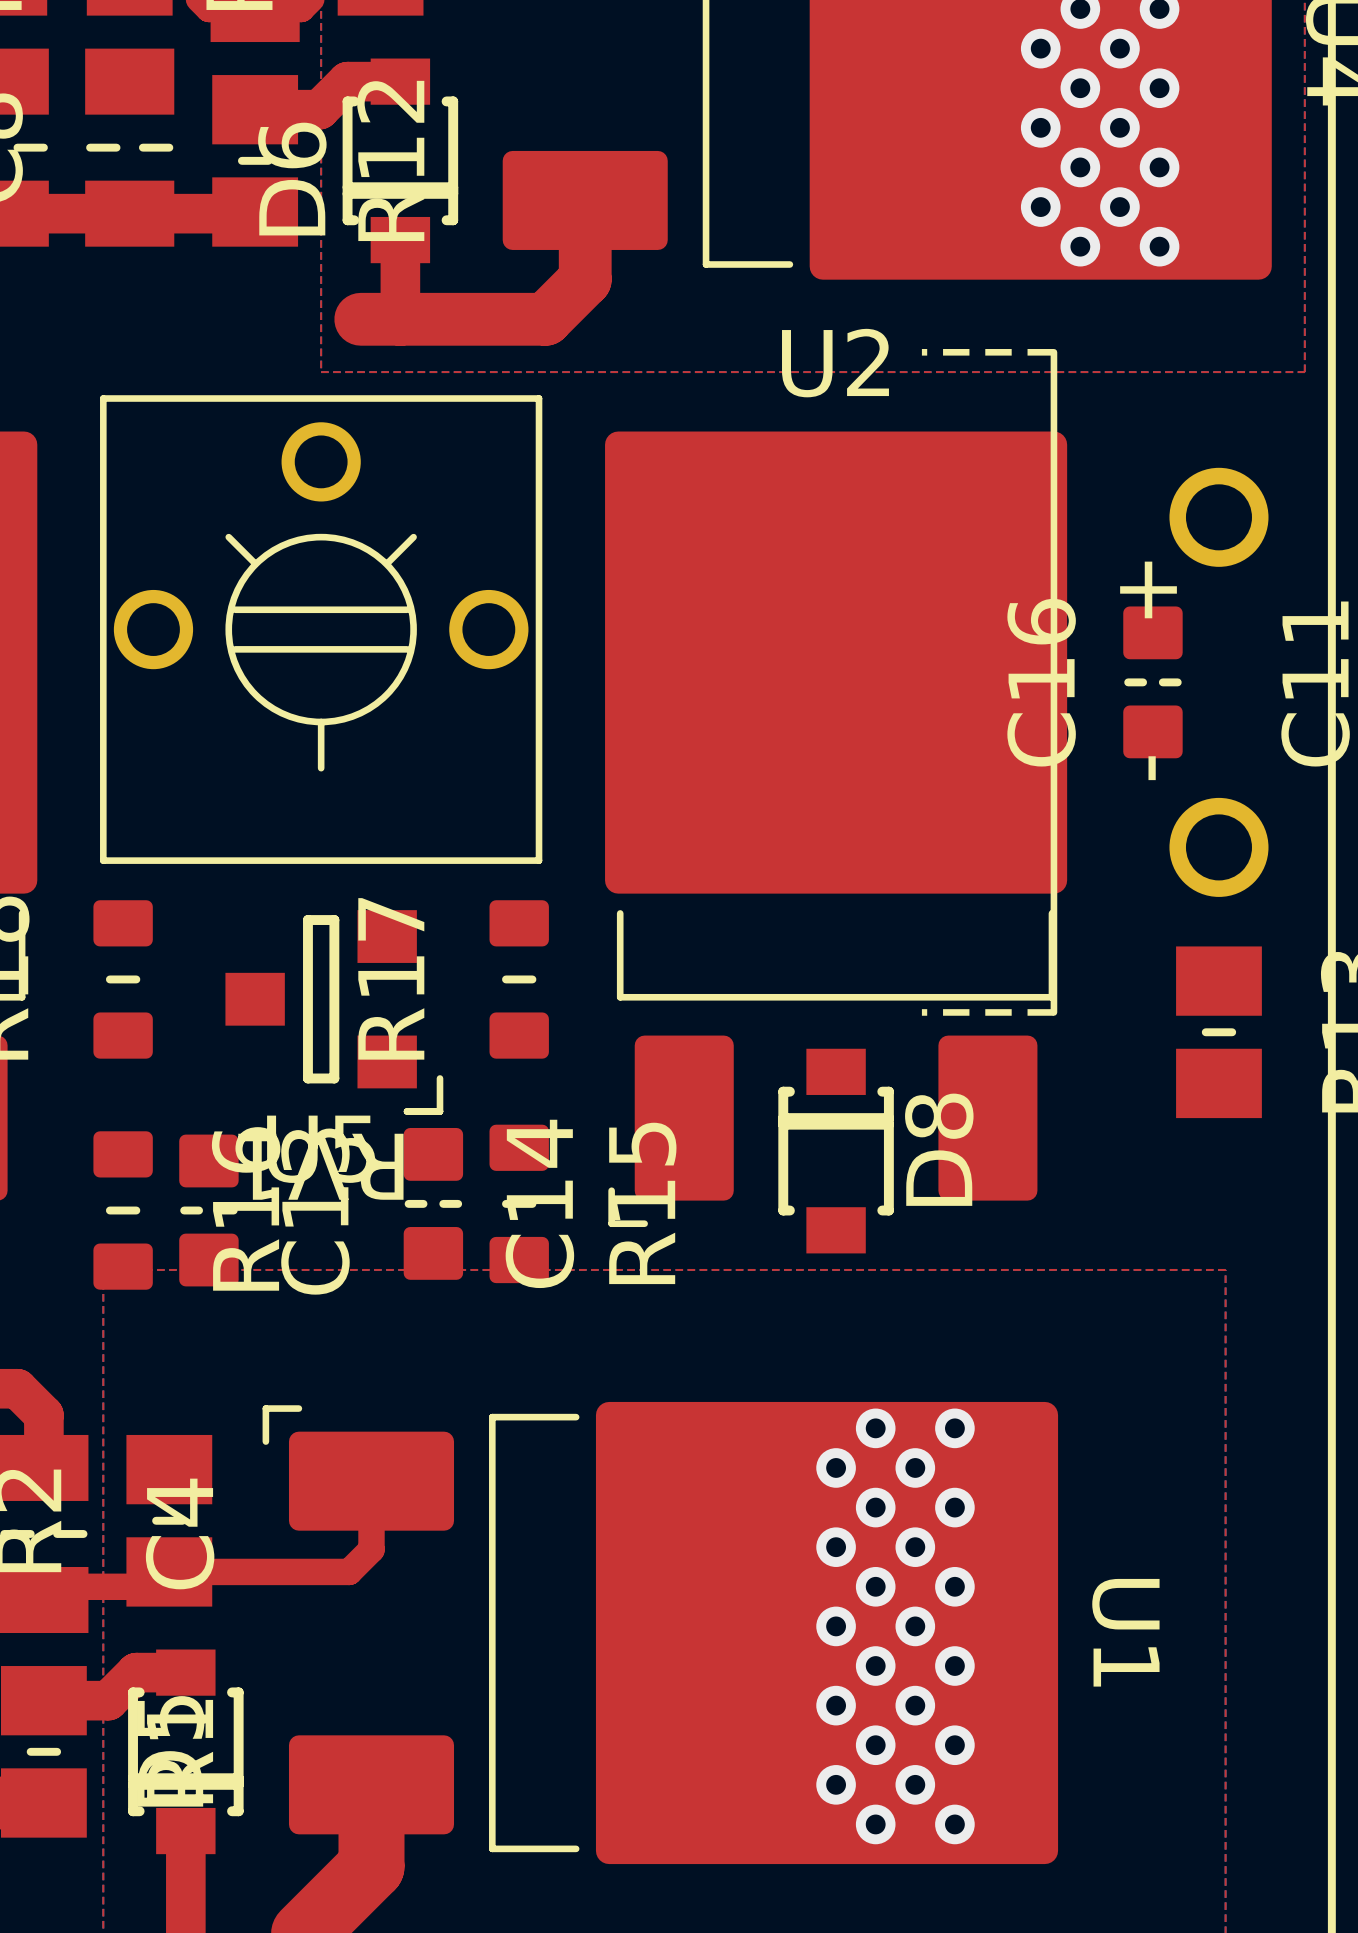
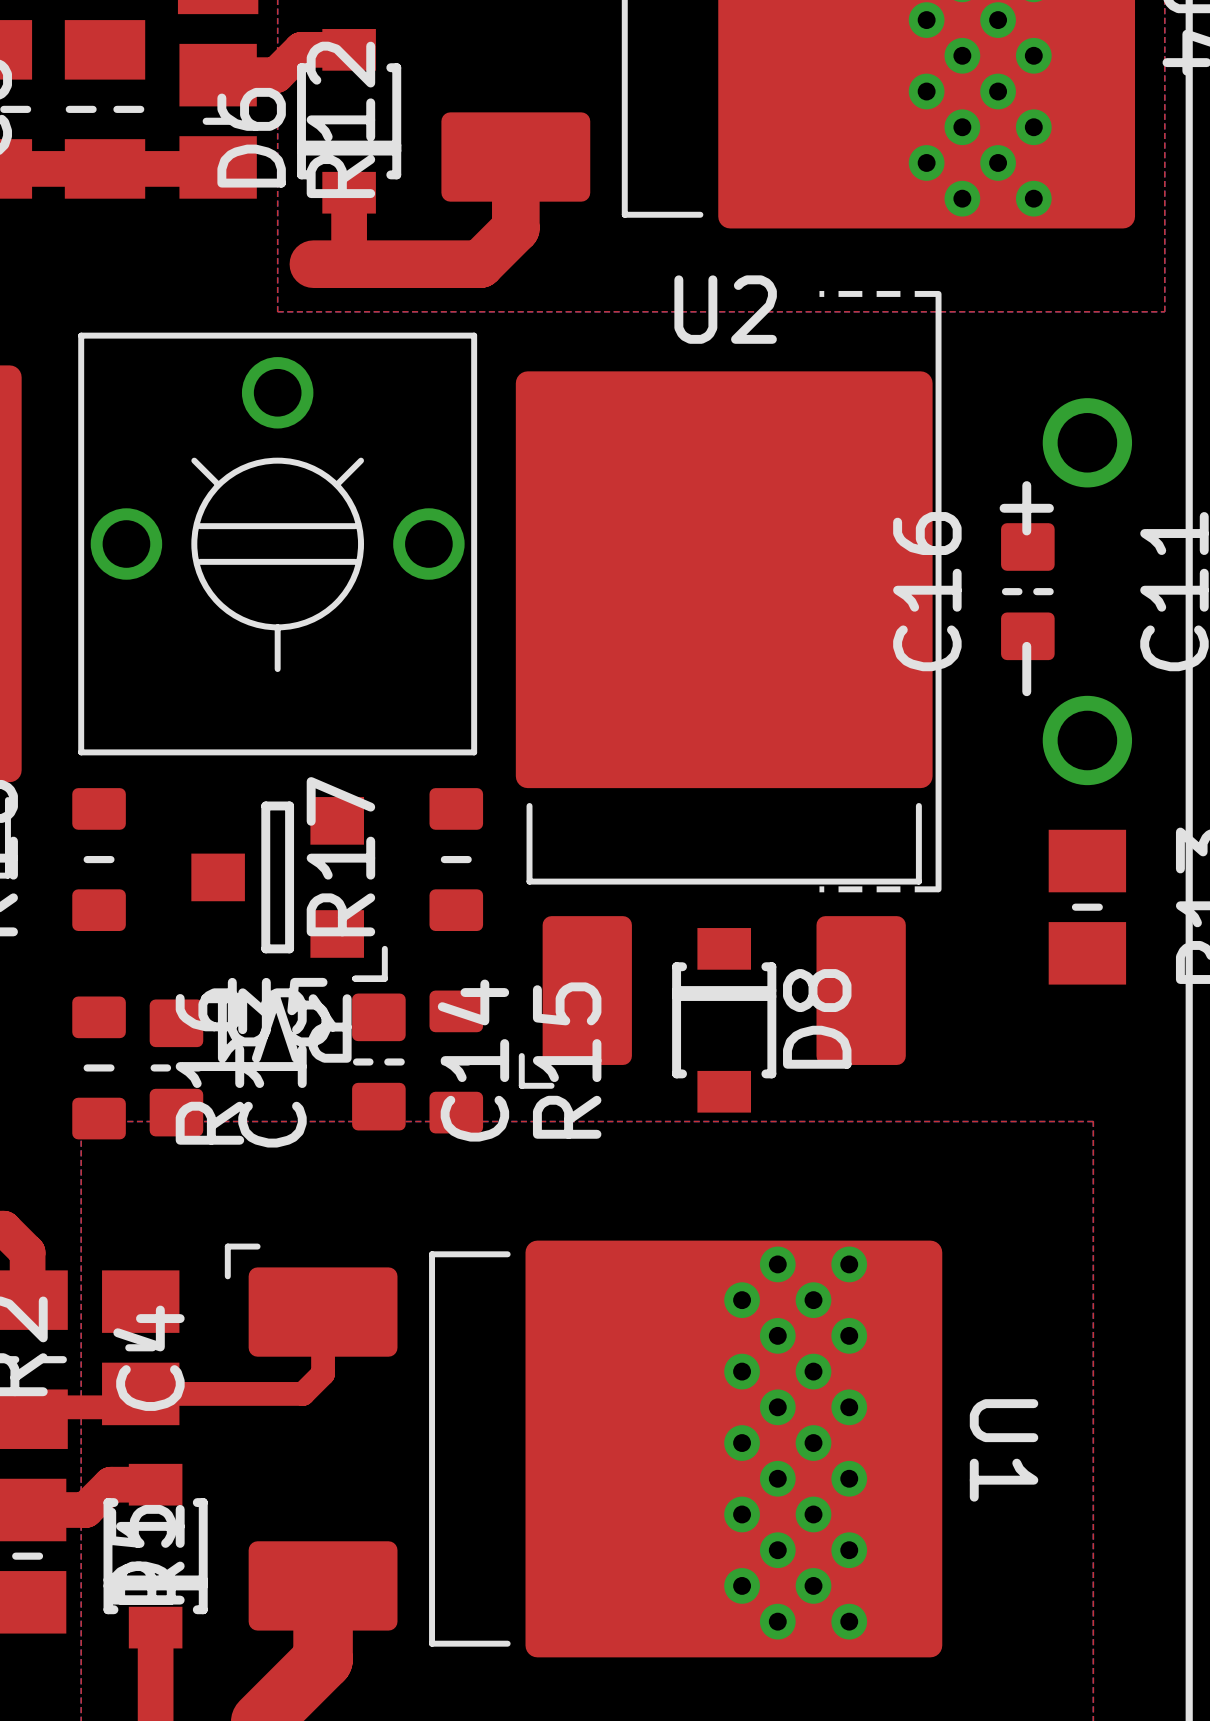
U2 position: (836, 829) -> (724, 730)
D8 position: (836, 1151) -> (724, 1020)

